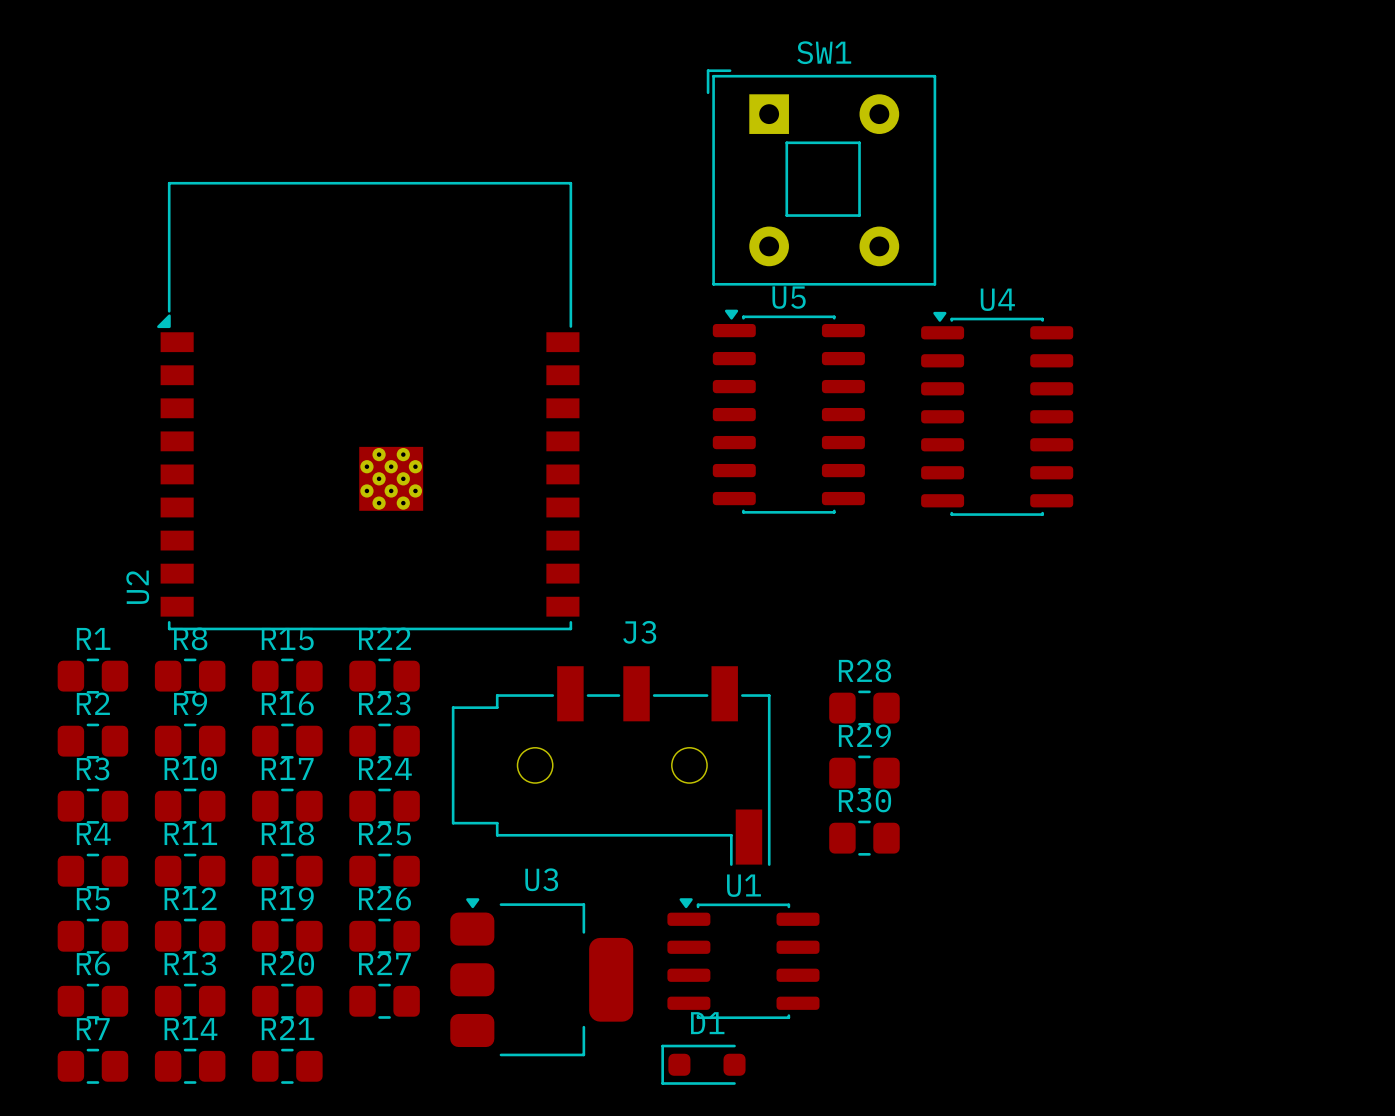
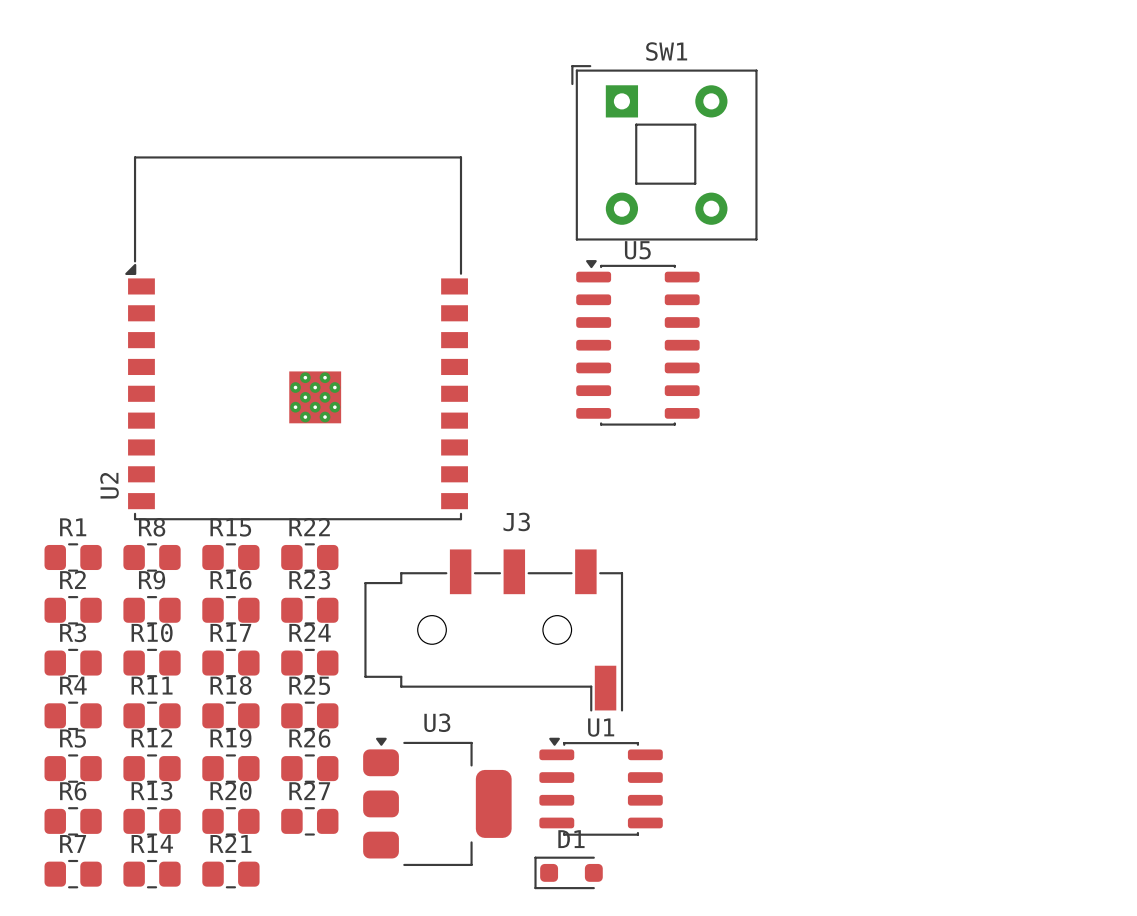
U4: (997, 413) -> none
R28: (864, 708) -> none
R29: (864, 773) -> none
R30: (864, 838) -> none

